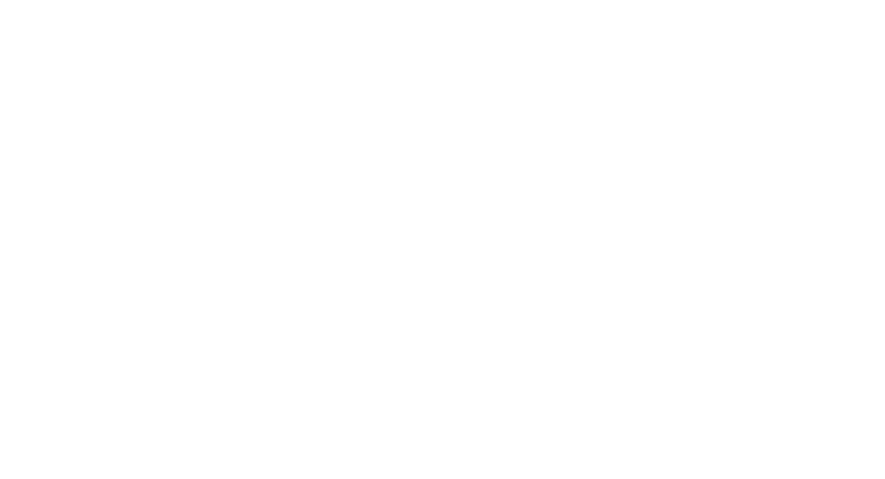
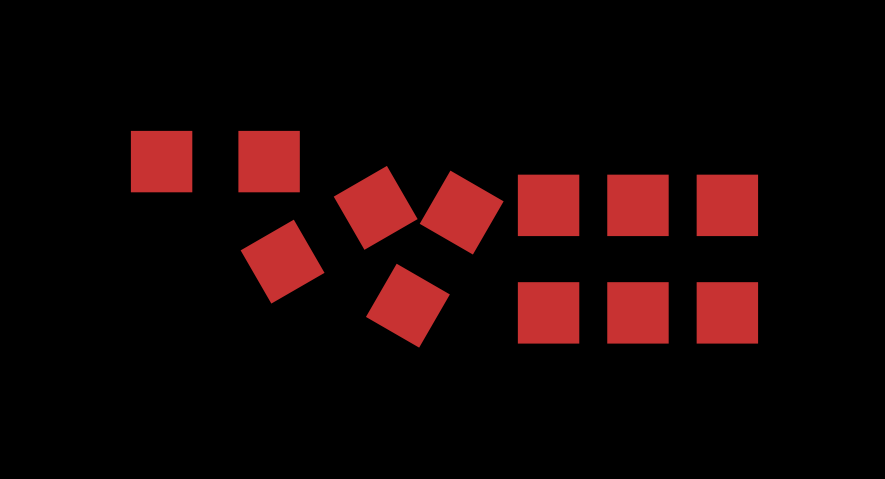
part: none -> (215, 161)
part: none -> (329, 234)
part: none -> (434, 259)
part: none -> (548, 259)
part: none -> (637, 259)
part: none -> (727, 259)

